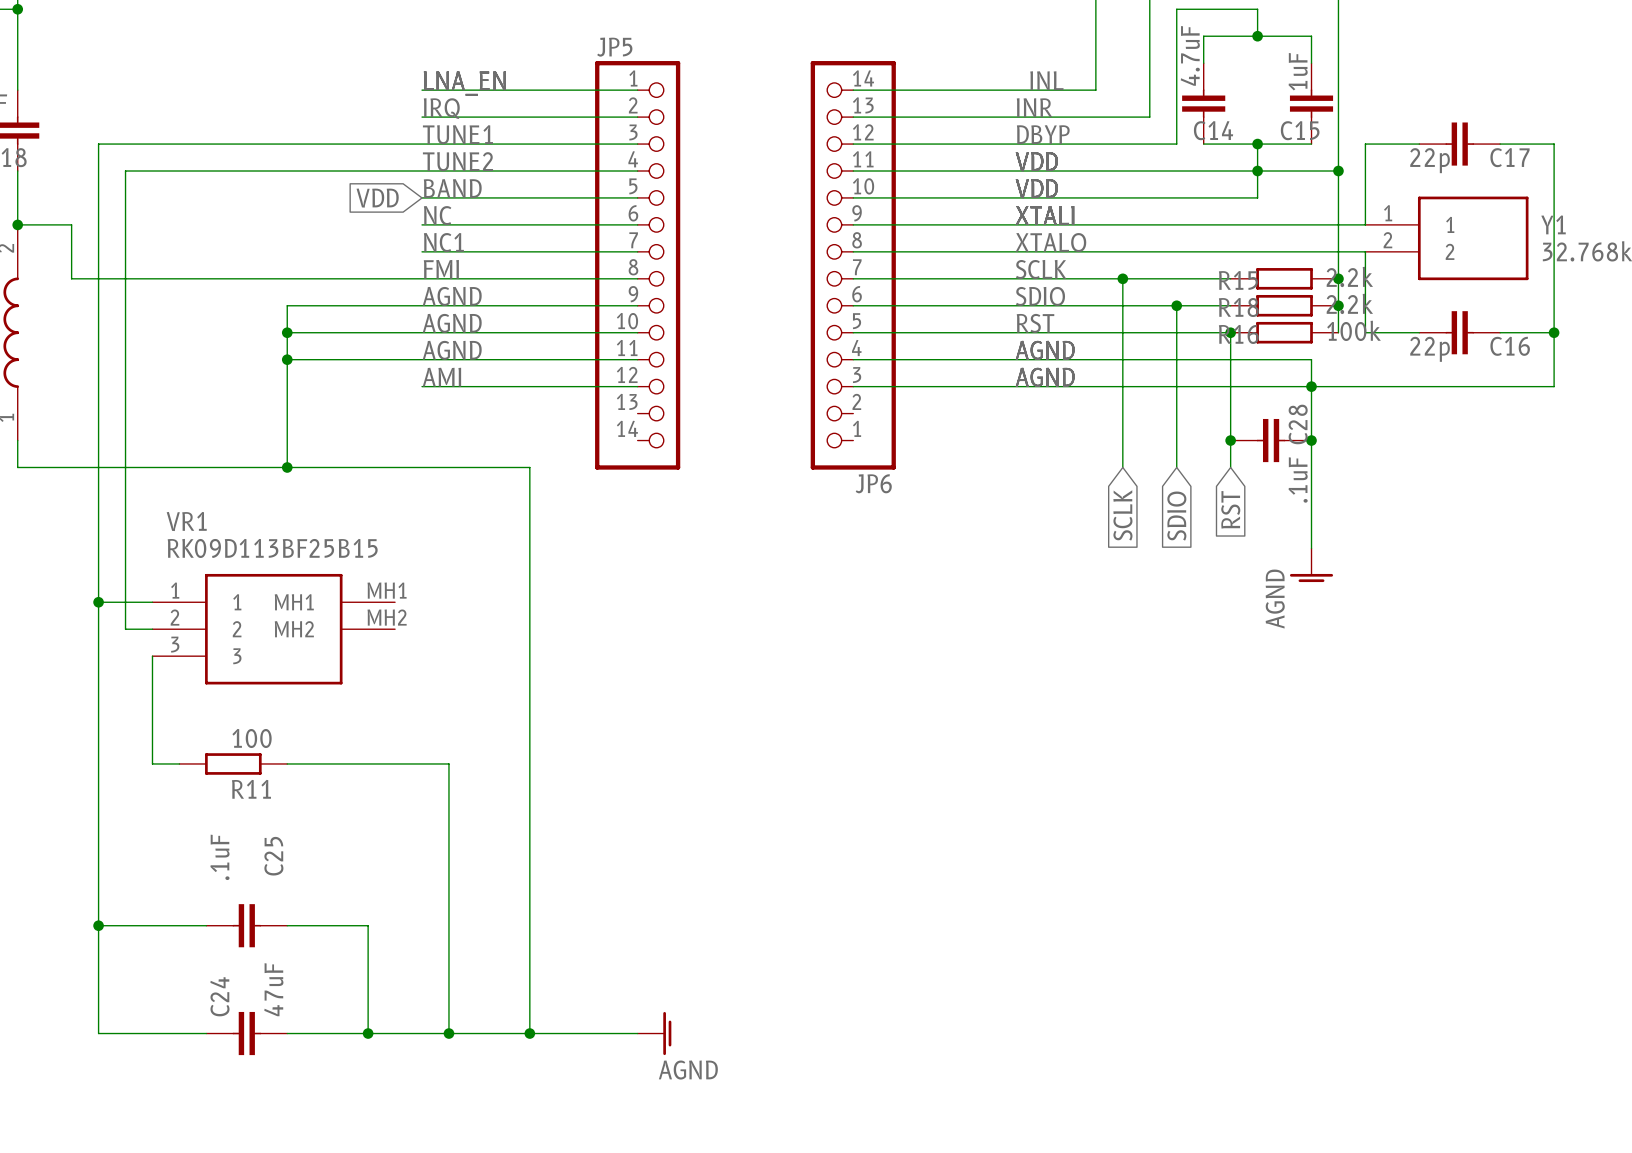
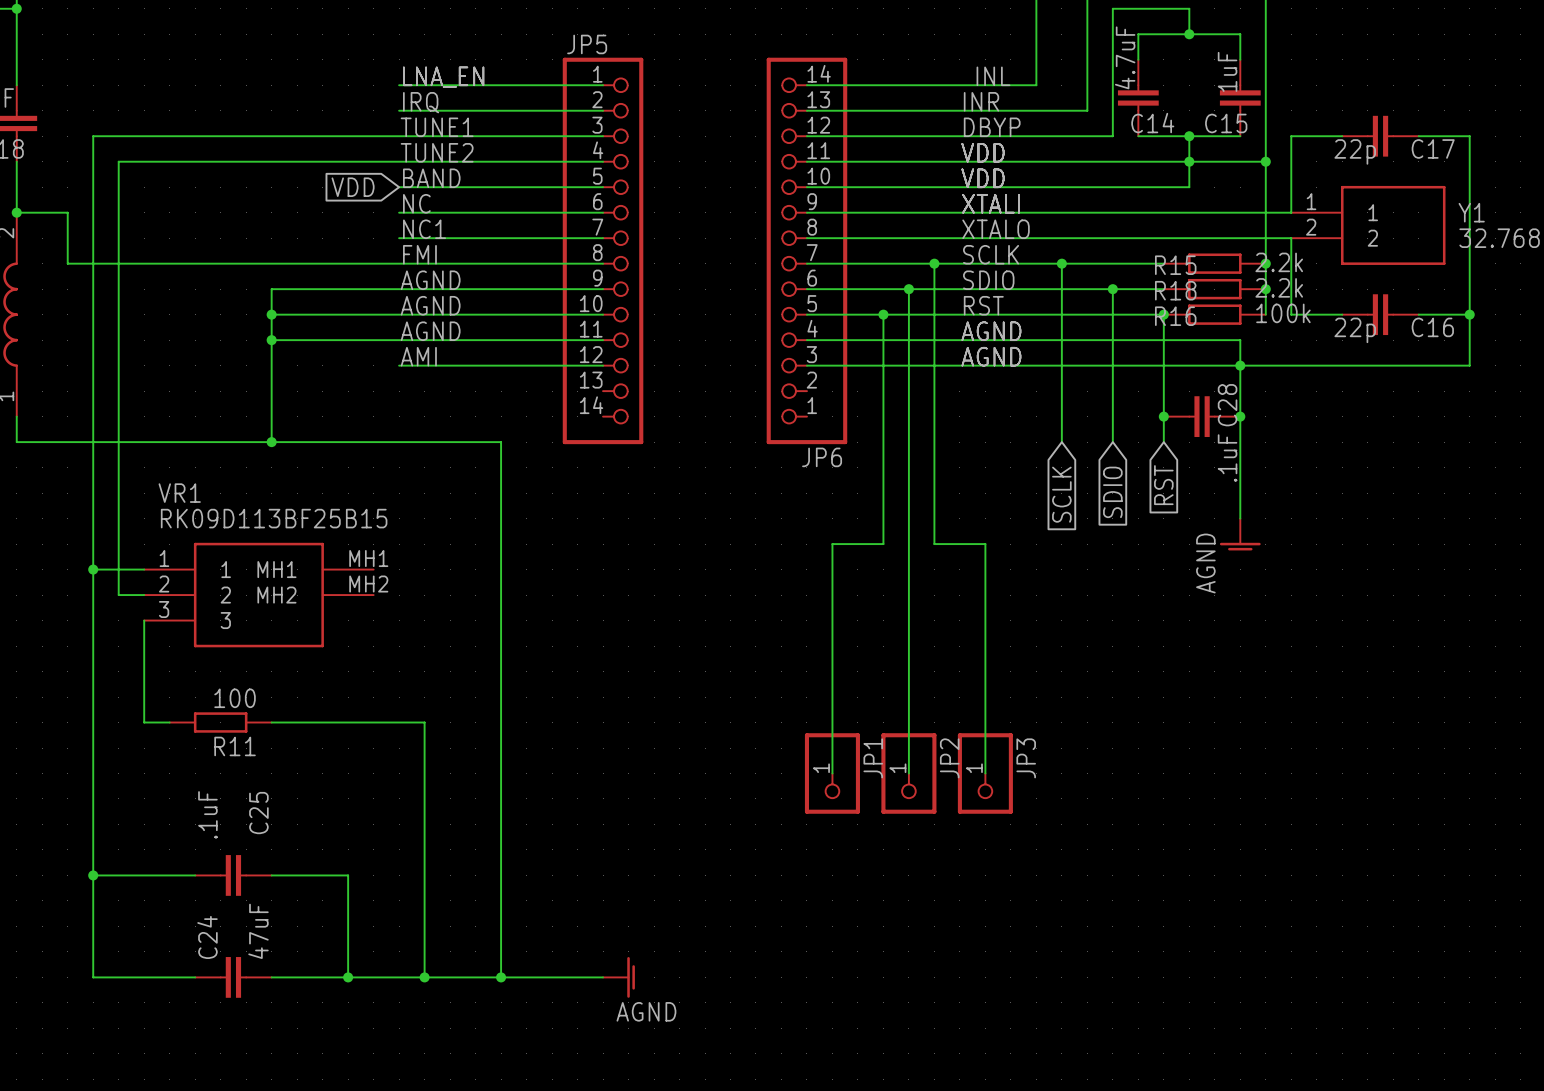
wire: none -> (934, 263) (934, 544) (985, 544) (985, 773)
junction: none -> (934, 263)
wire: none -> (908, 289) (908, 773)
junction: none -> (908, 289)
wire: none -> (883, 314) (883, 544) (832, 544) (832, 773)
junction: none -> (883, 314)
JP1: none -> (832, 773)
JP2: none -> (908, 773)
JP3: none -> (985, 773)

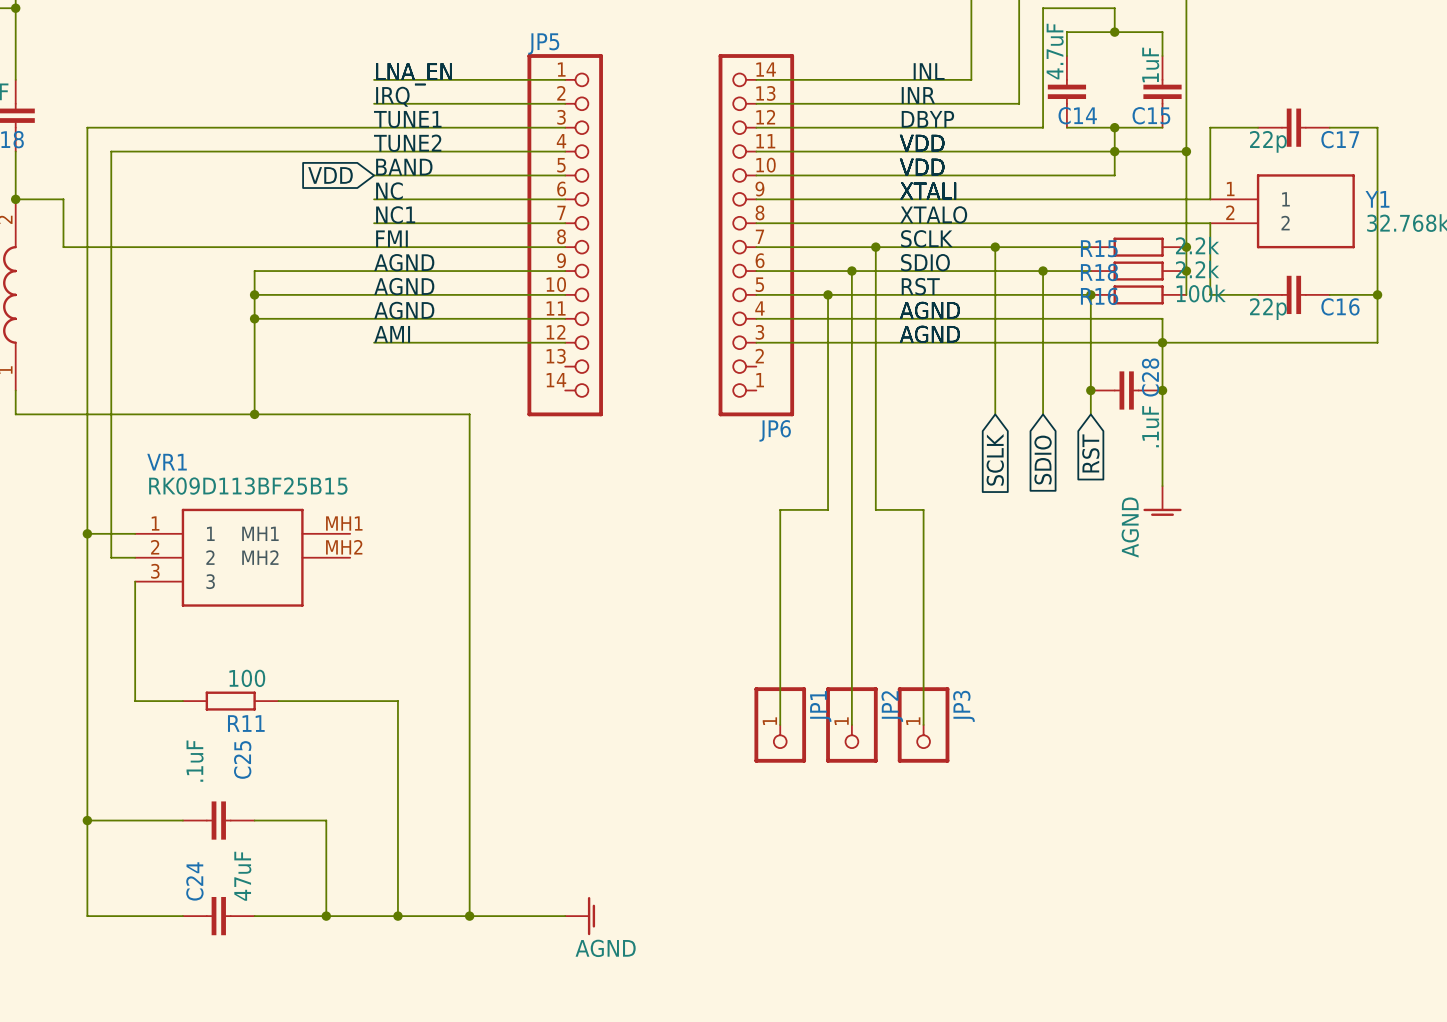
wire: (144, 722) (169, 722) -> (135, 677) (135, 701) (182, 701)
R11 position: (220, 722) -> (230, 701)
wire: (271, 722) (424, 722) (424, 748) -> (278, 701) (397, 701)

